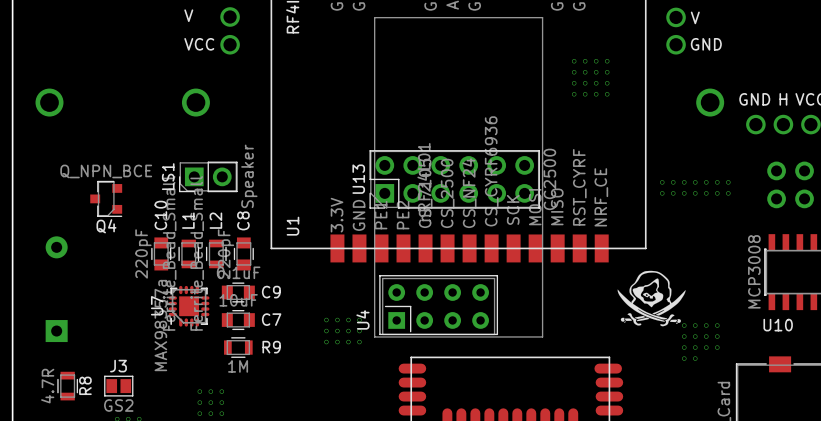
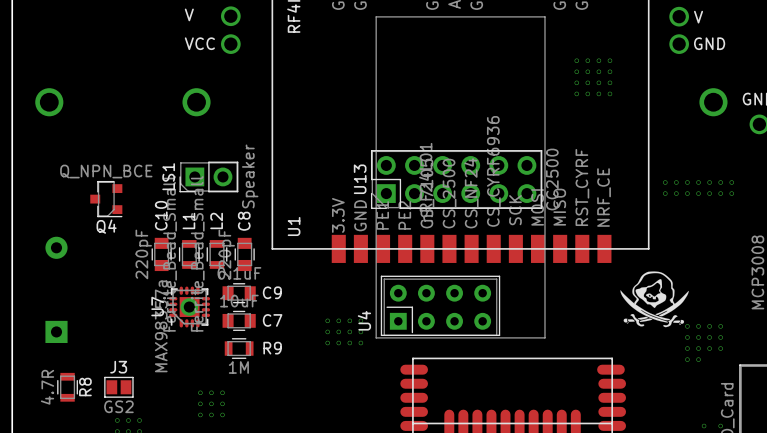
part: none -> (189, 307)

